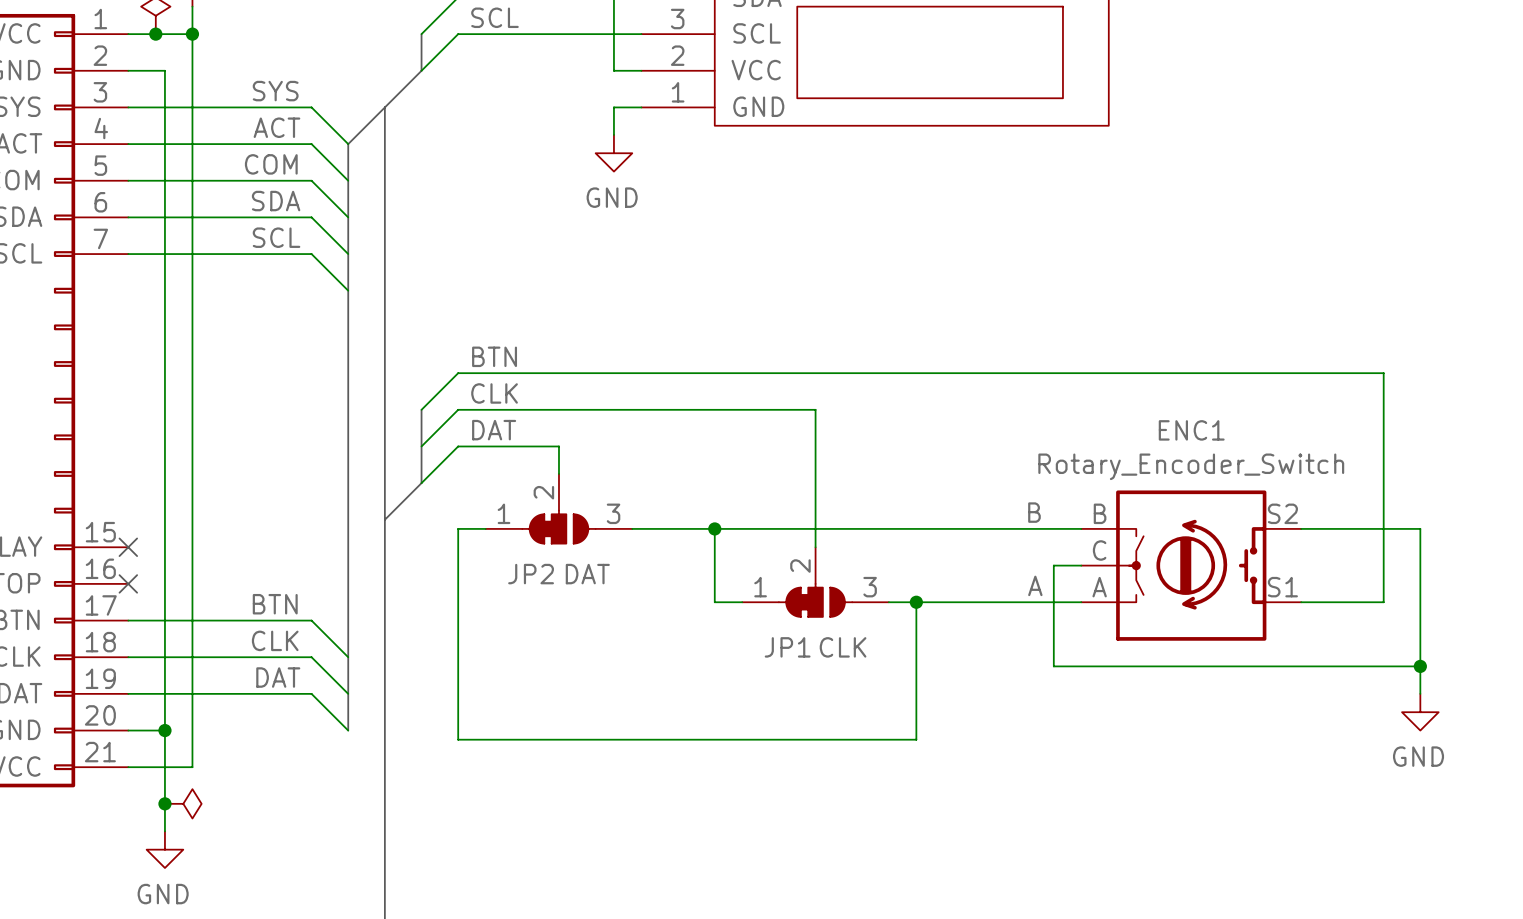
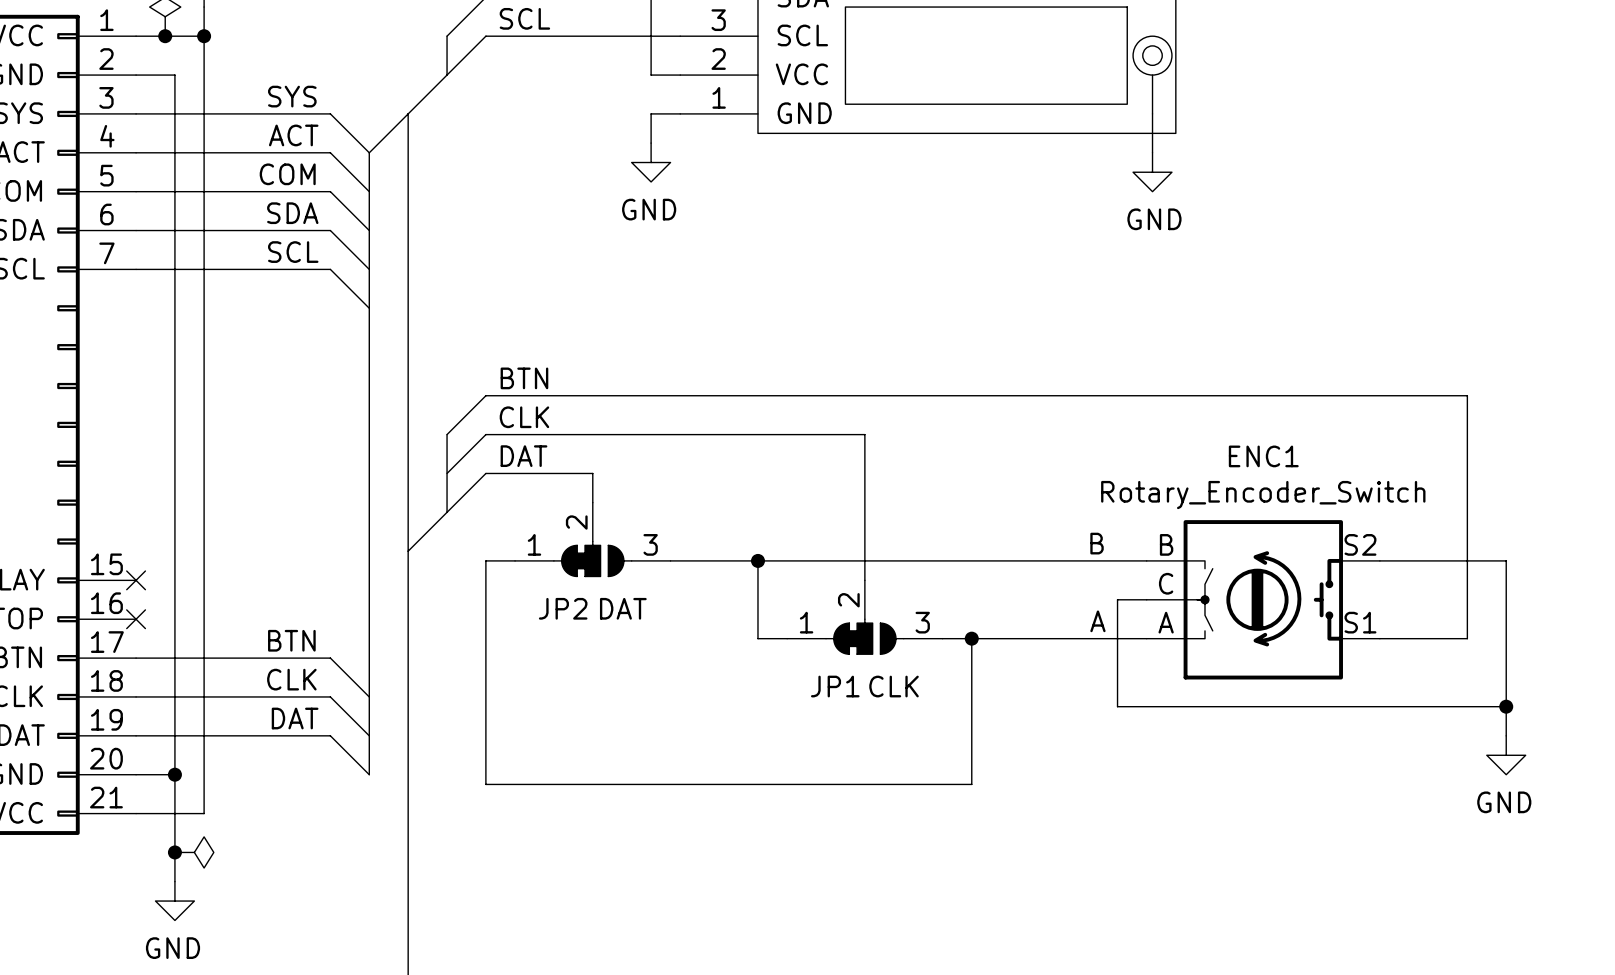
part: none -> (1152, 75)
wire: none -> (1152, 113) (1152, 152)
power symbol: none -> GND (1152, 172)

